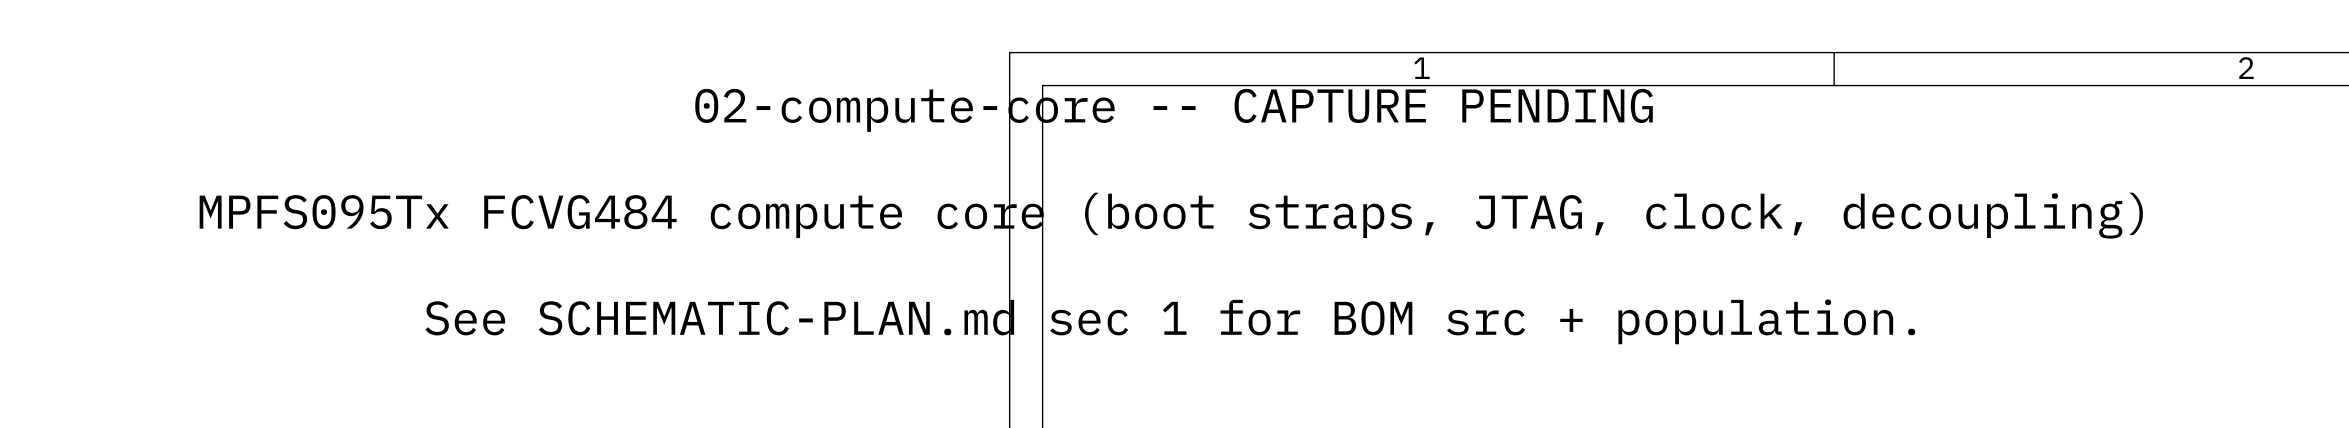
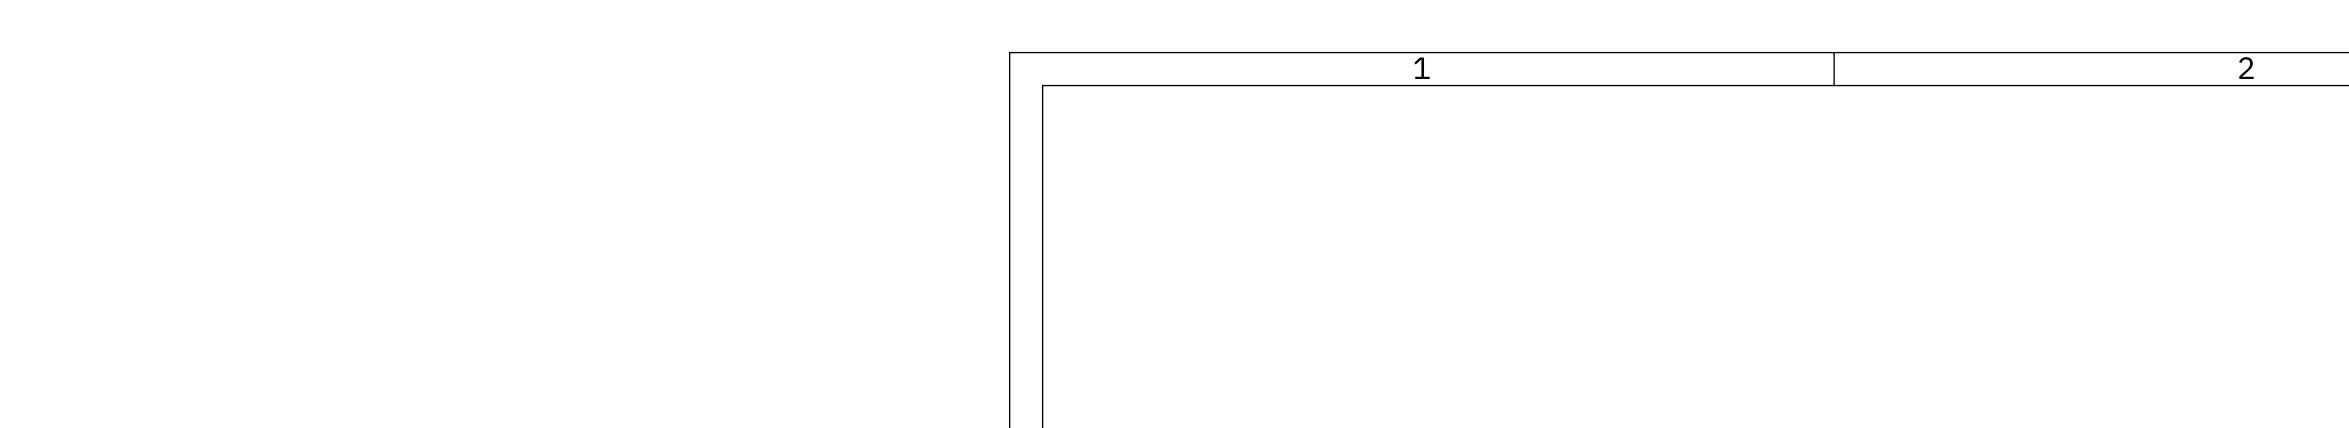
text: 02-compute-core -- CAPTURE PENDING (1174, 110) -> none
text: MPFS095Tx FCVG484 compute core (boot straps, JTAG, clock, decoupling) (1171, 215) -> none
text: See SCHEMATIC-PLAN.md sec 1 for BOM src + population. (1170, 321) -> none

